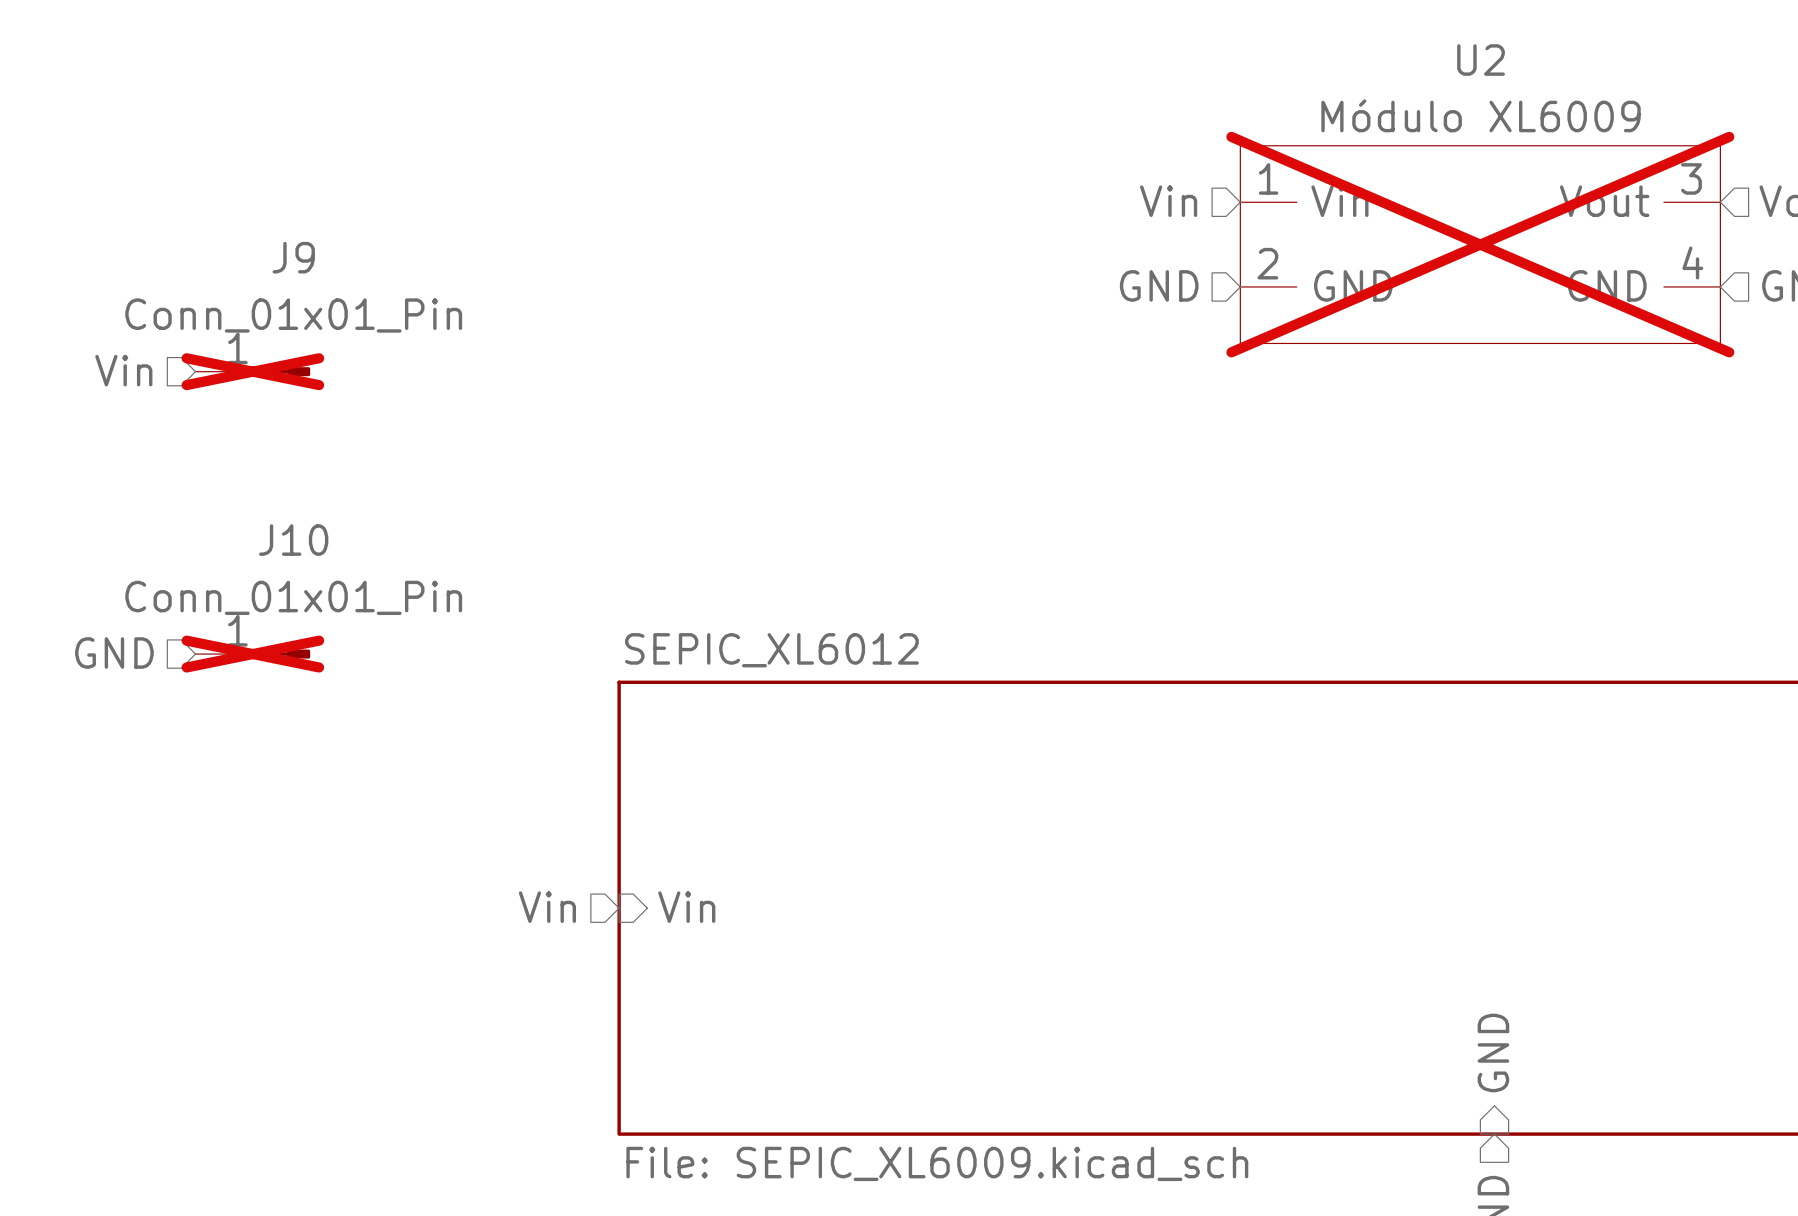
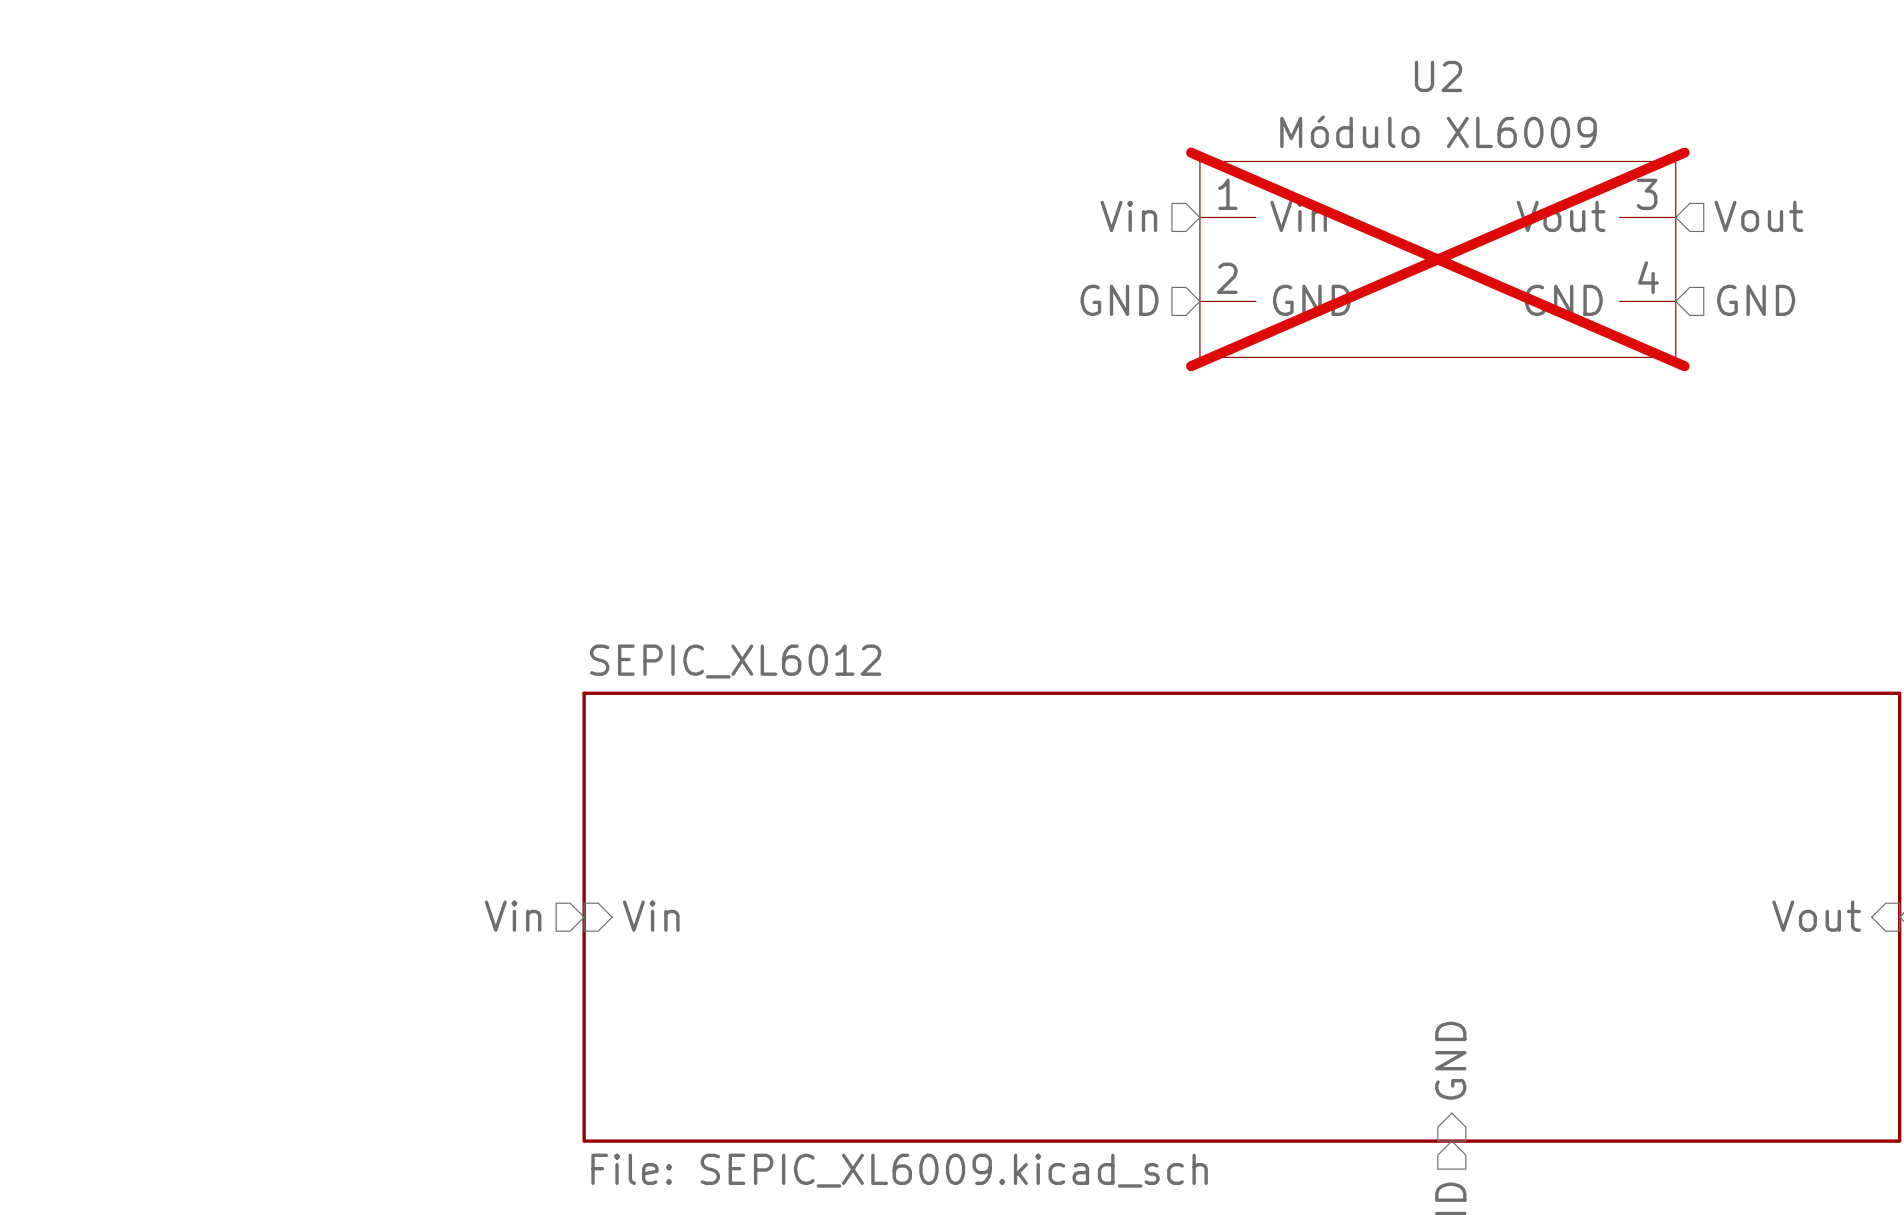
hierarchical label: Vin (123, 370) -> none
J9: Conn_01x01_Pin (252, 371) -> none
hierarchical label: GND (114, 653) -> none
J10: Conn_01x01_Pin (252, 654) -> none

